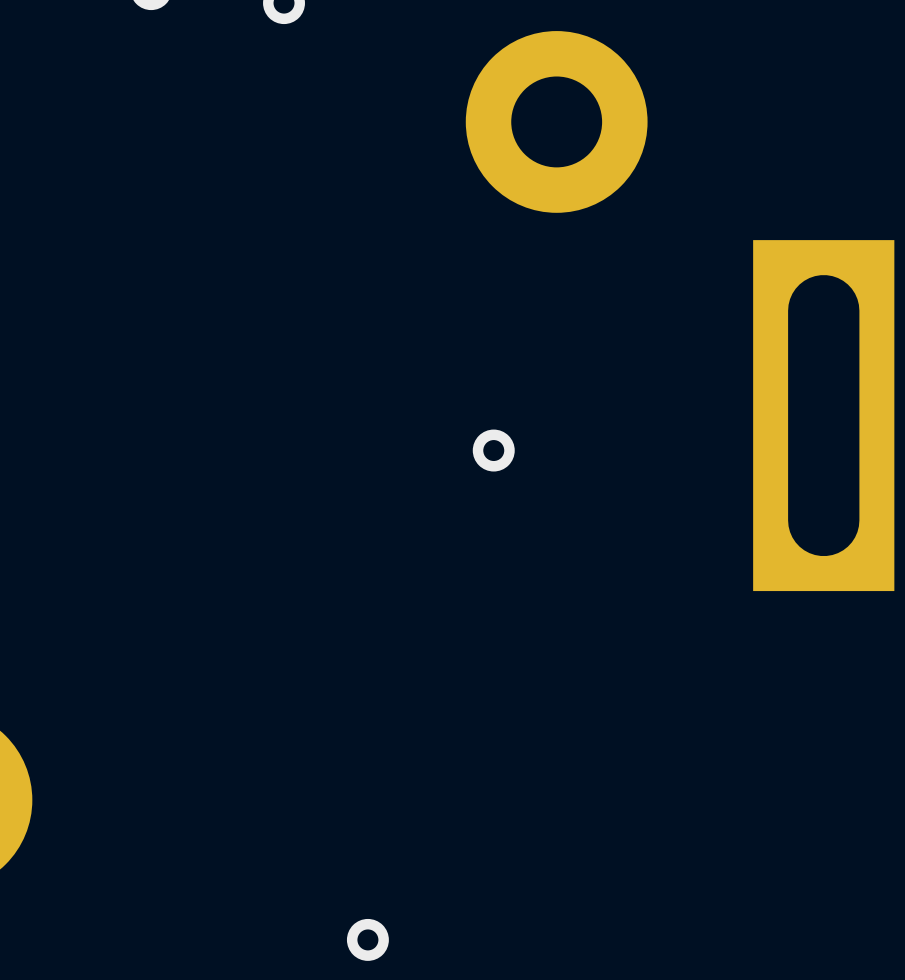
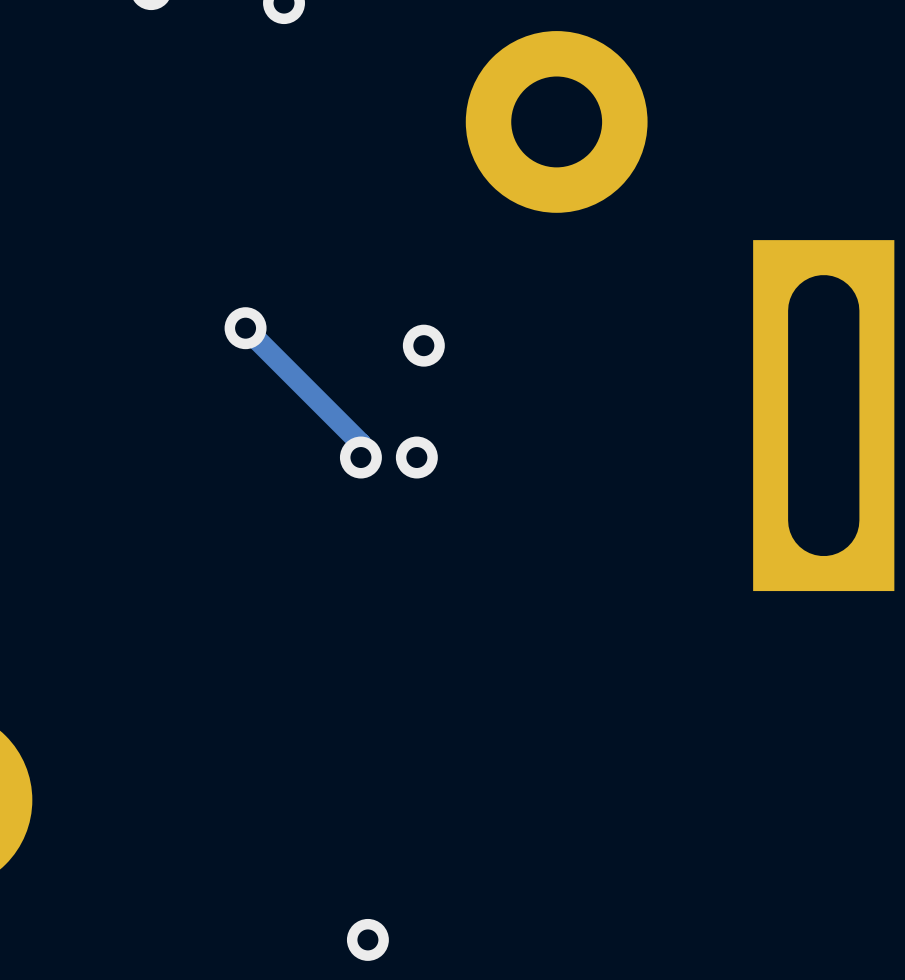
track: none -> (245, 328) (360, 443) (360, 457)
via: none -> (245, 328)
via: none -> (423, 345)
via: (493, 450) -> none
via: none -> (360, 457)
via: none -> (416, 457)

